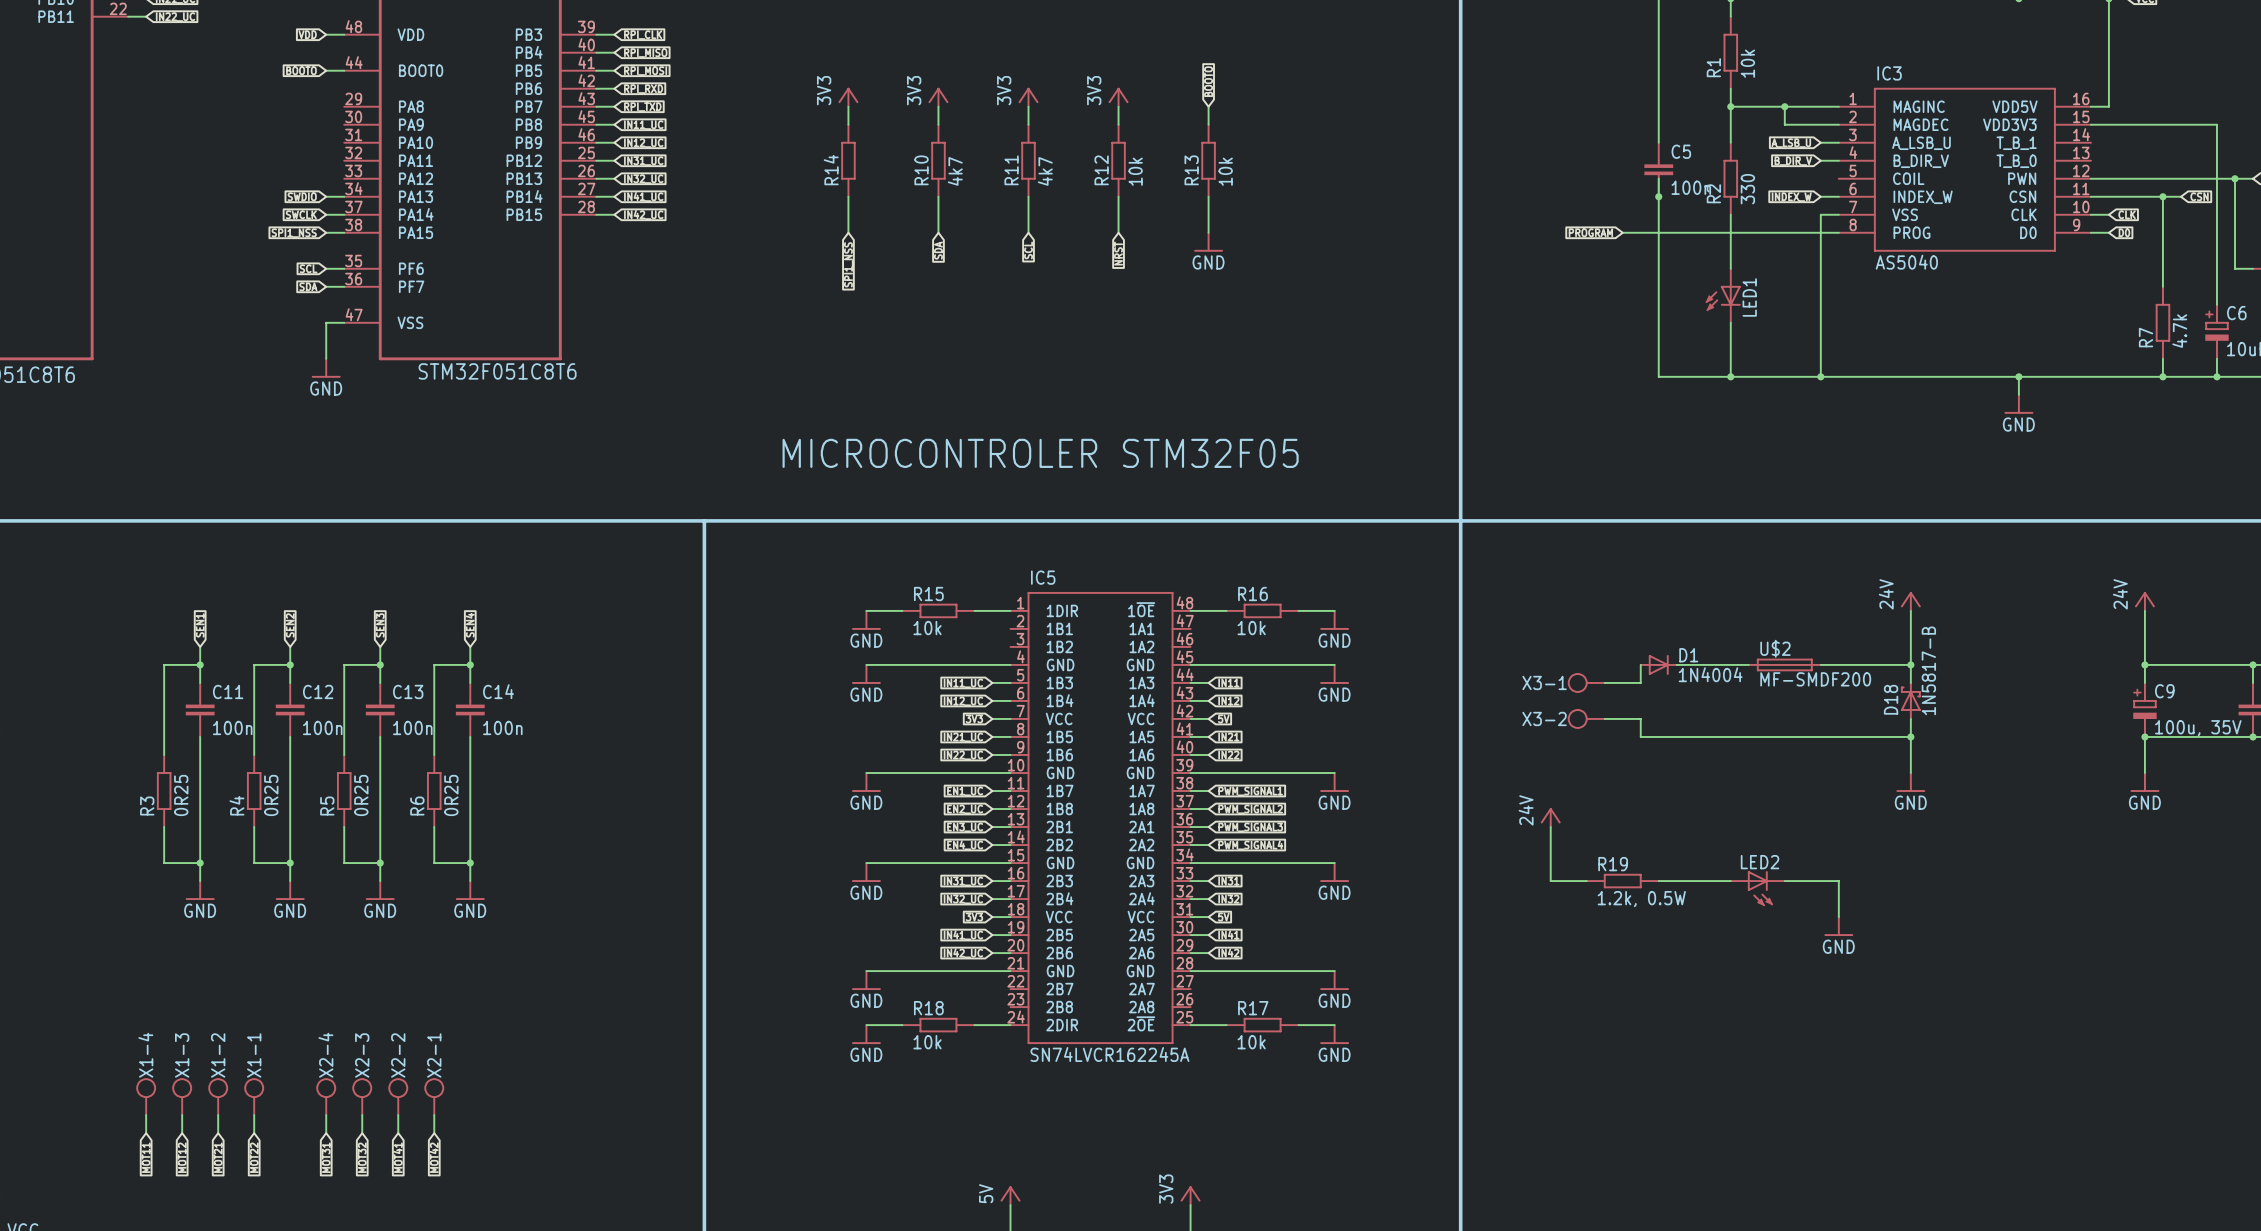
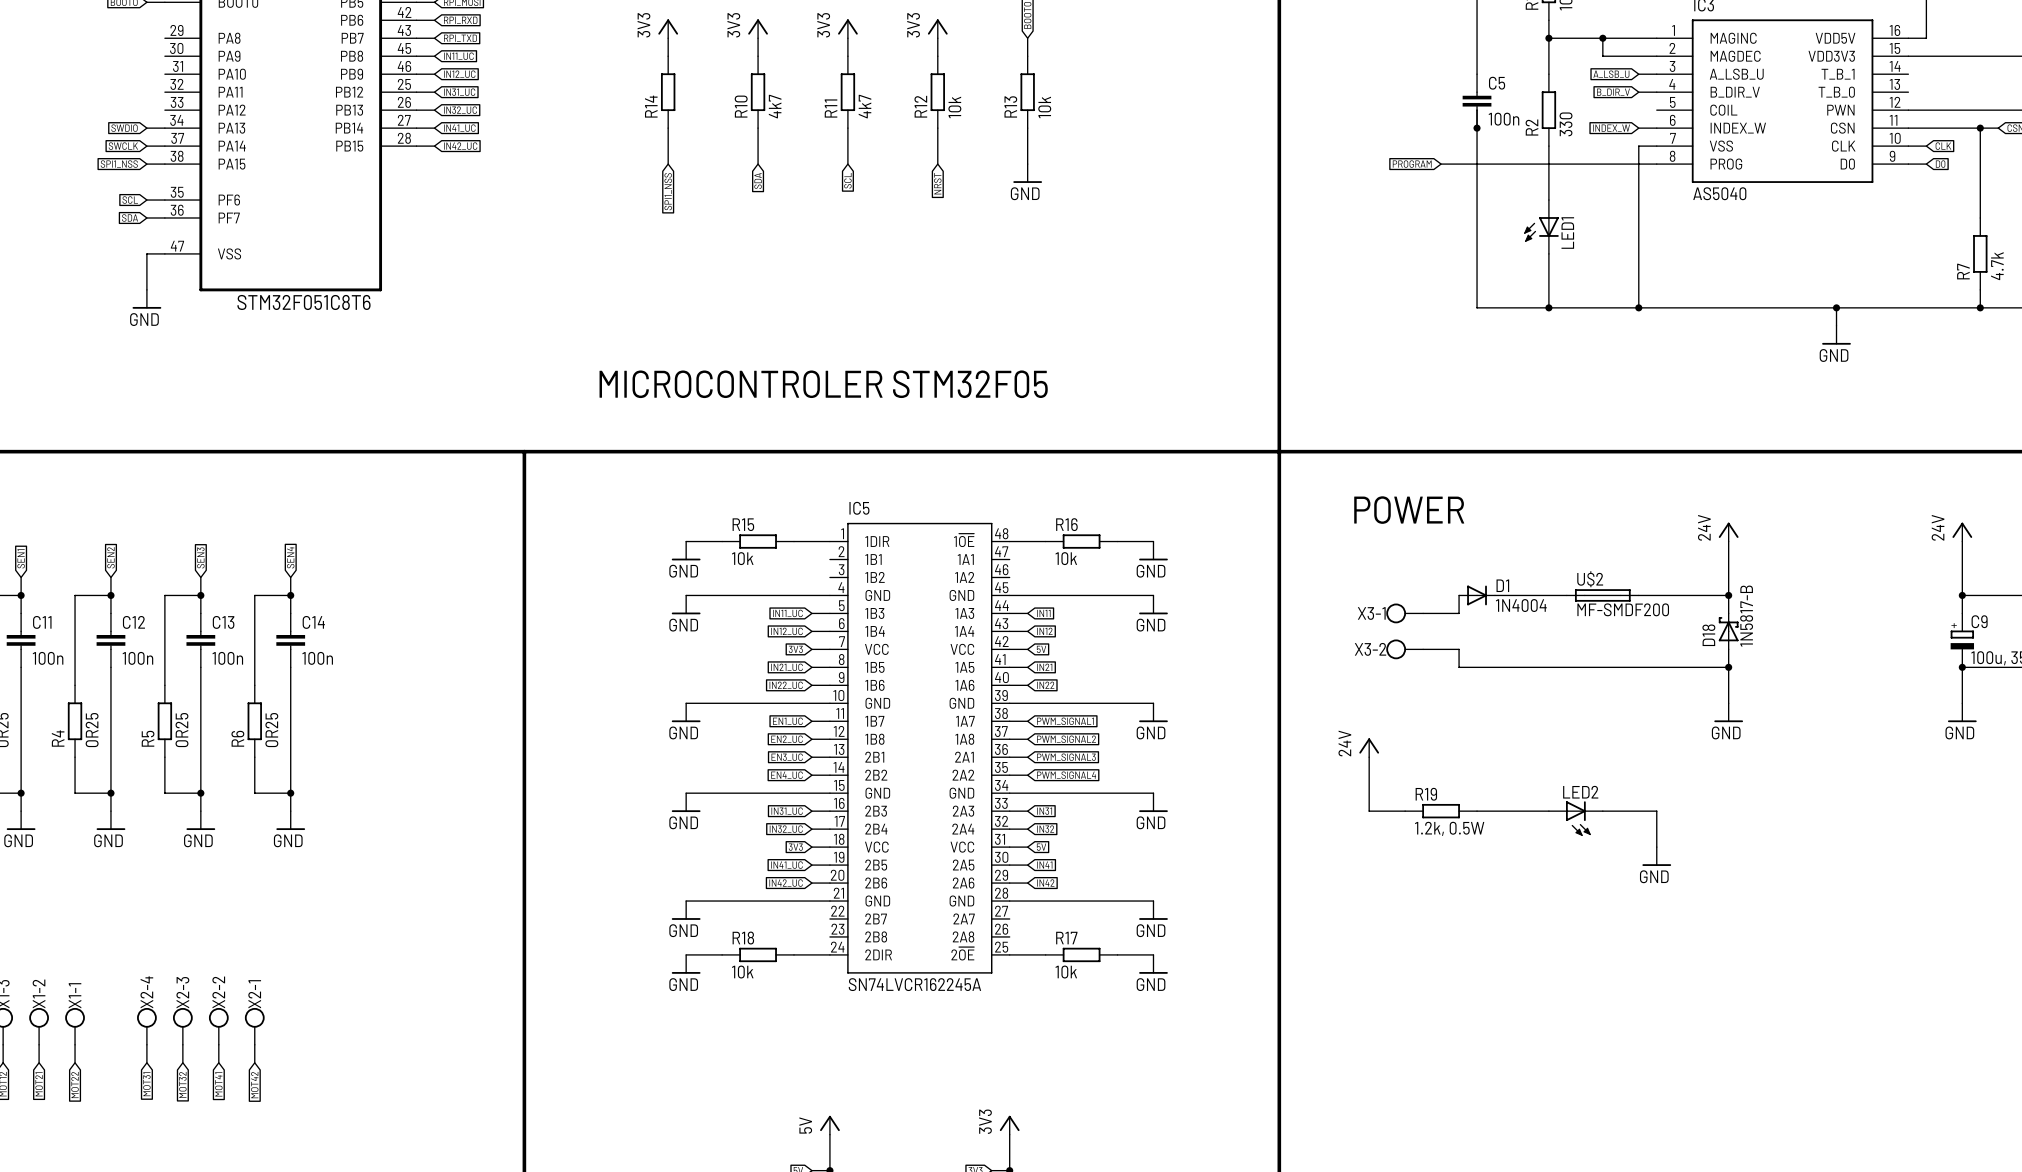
text: none -> POWER (1409, 510)

